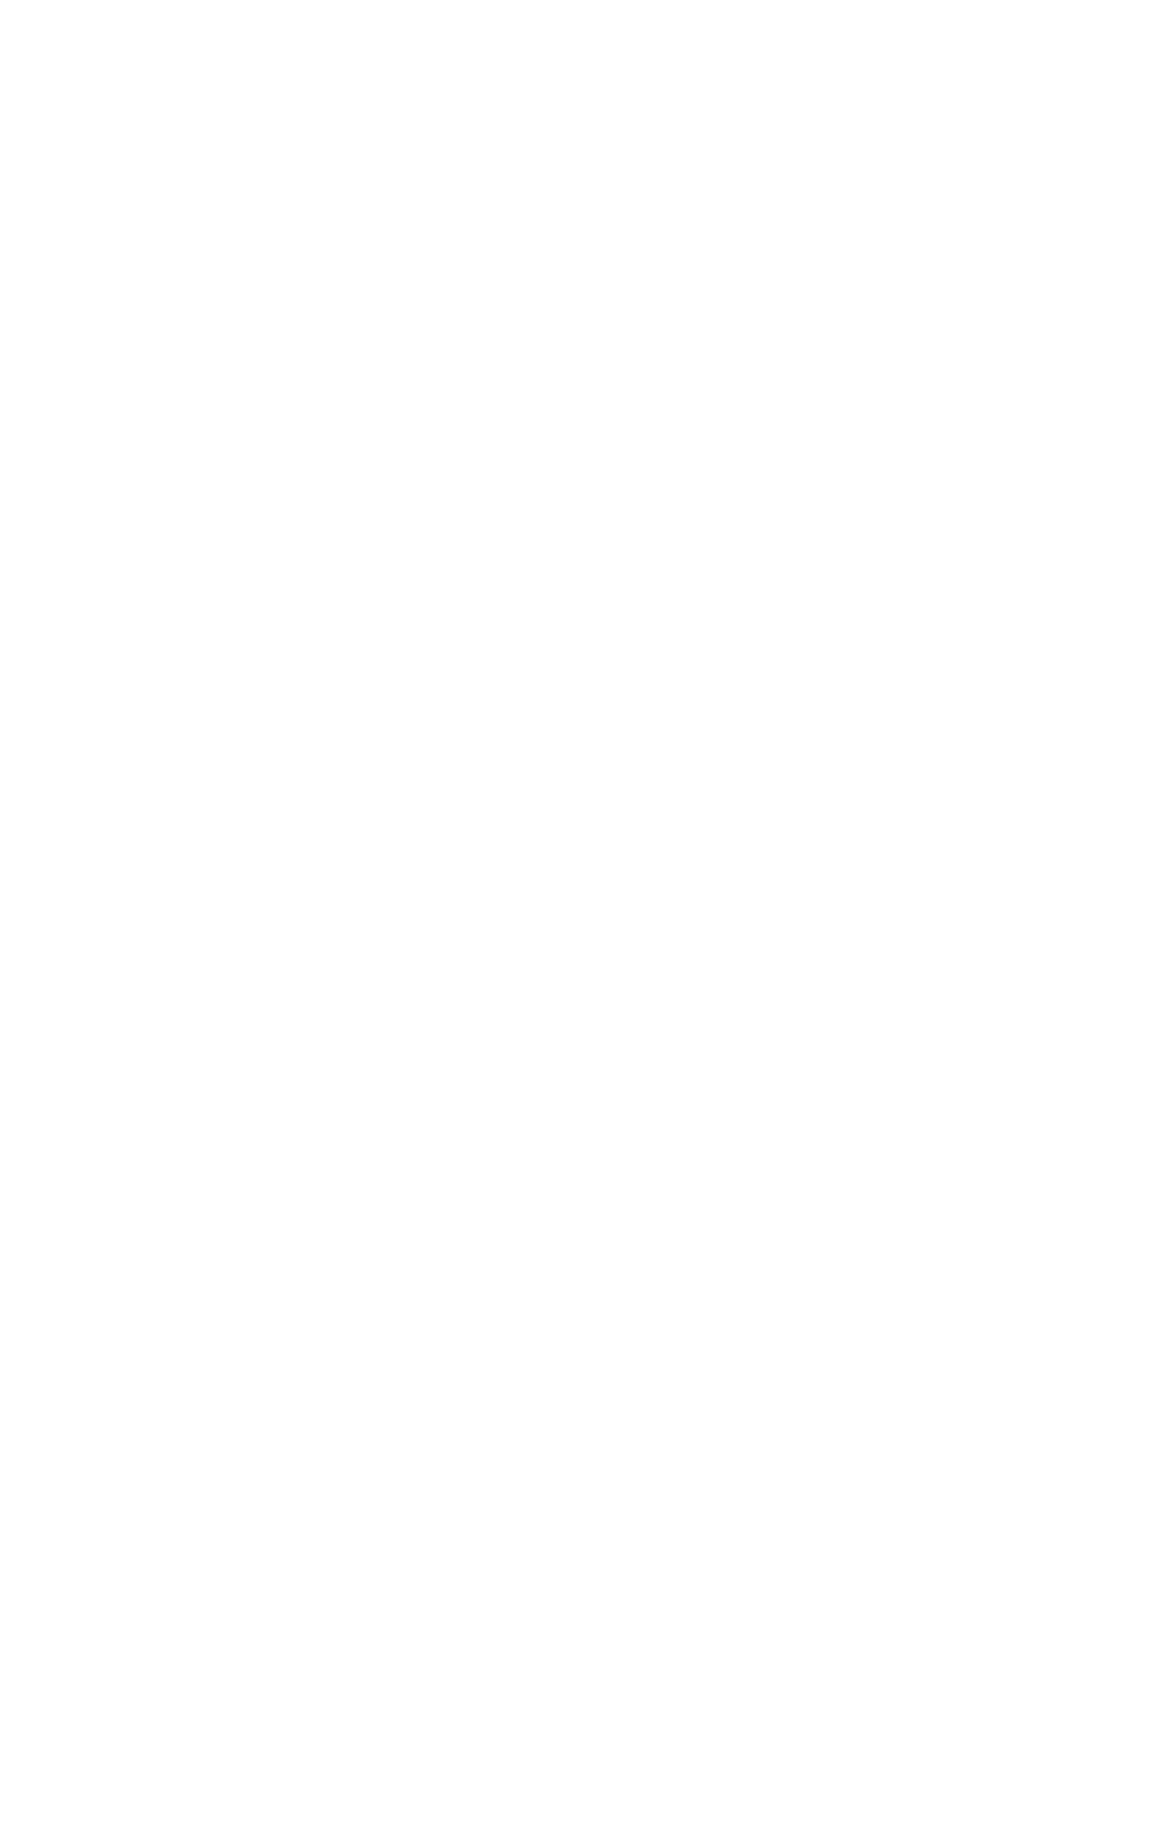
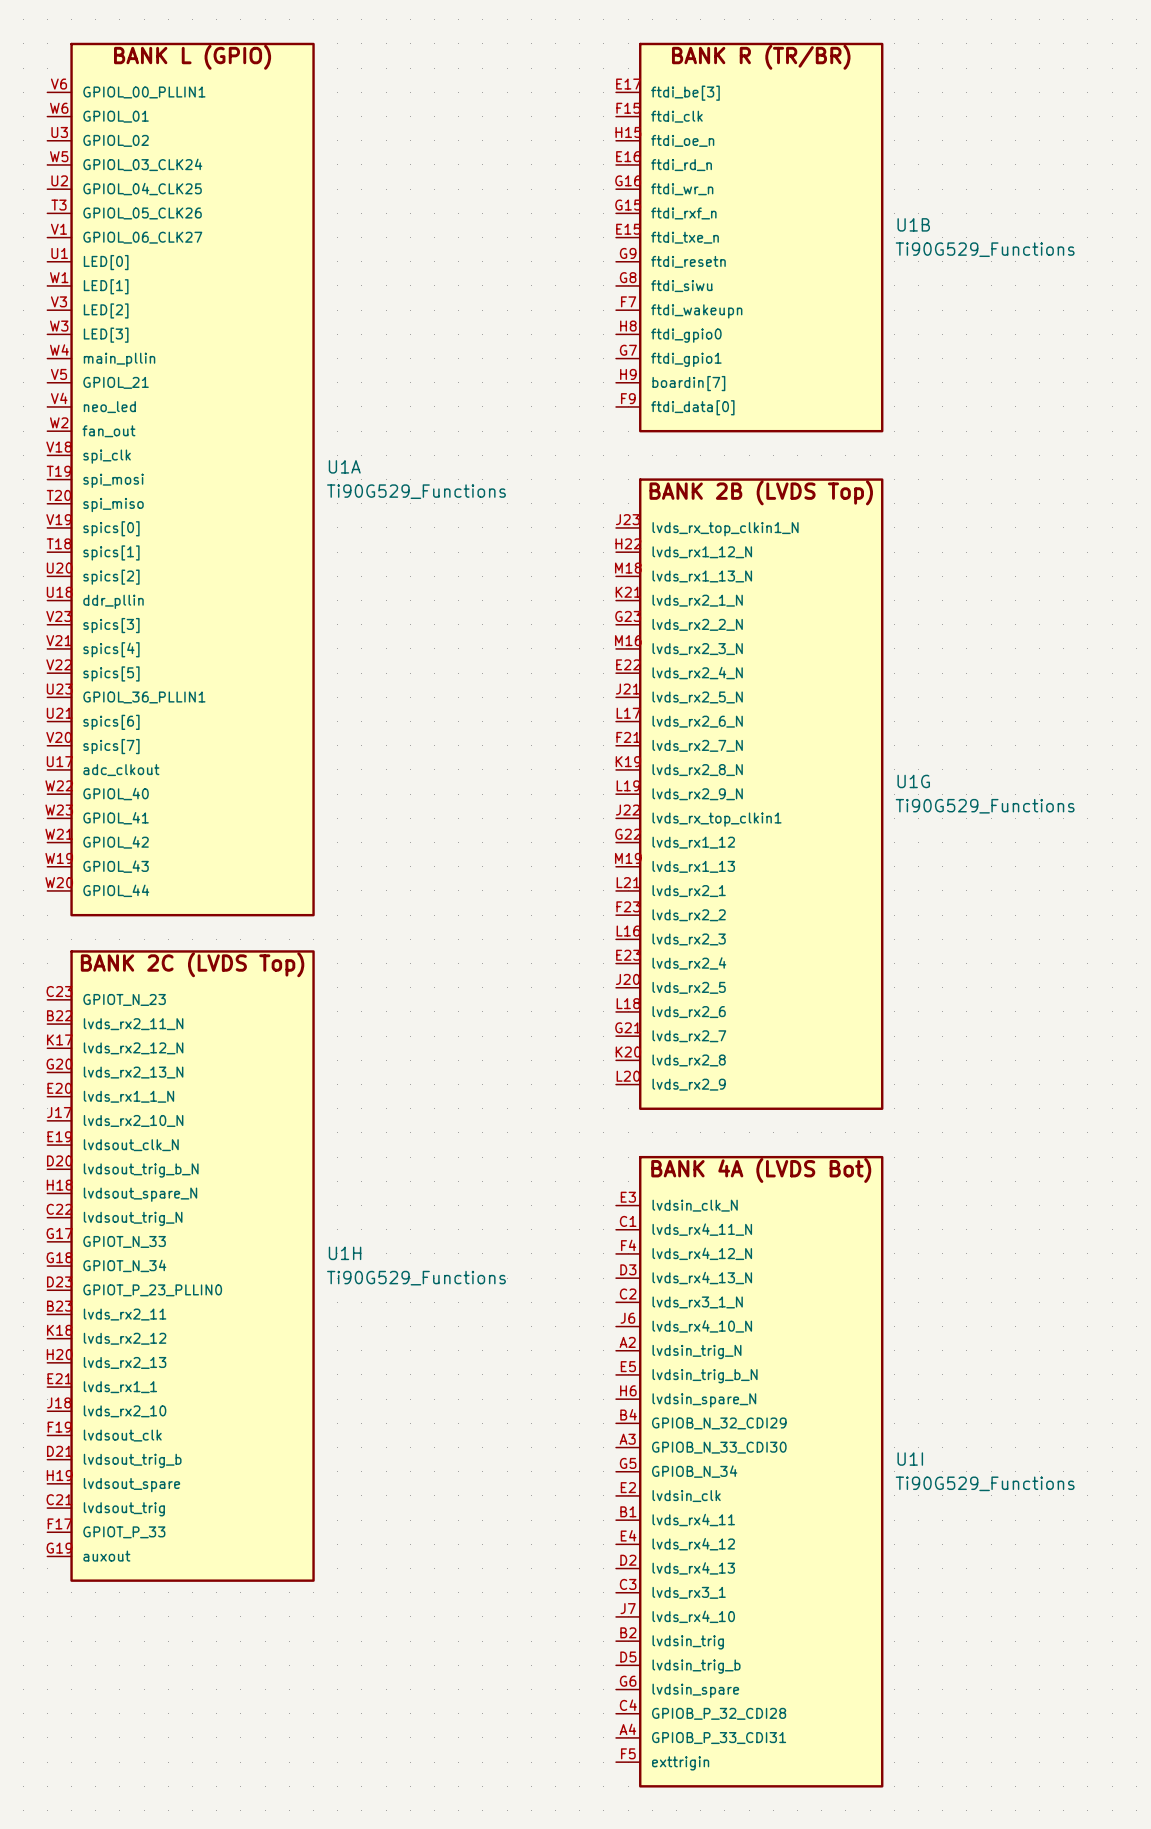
U1B: none -> Ti90G529_Functions (749, 237)
U1A: none -> Ti90G529_Functions (181, 479)
U1G: none -> Ti90G529_Functions (749, 794)
U1H: none -> Ti90G529_Functions (181, 1266)
U1I: none -> Ti90G529_Functions (749, 1471)

